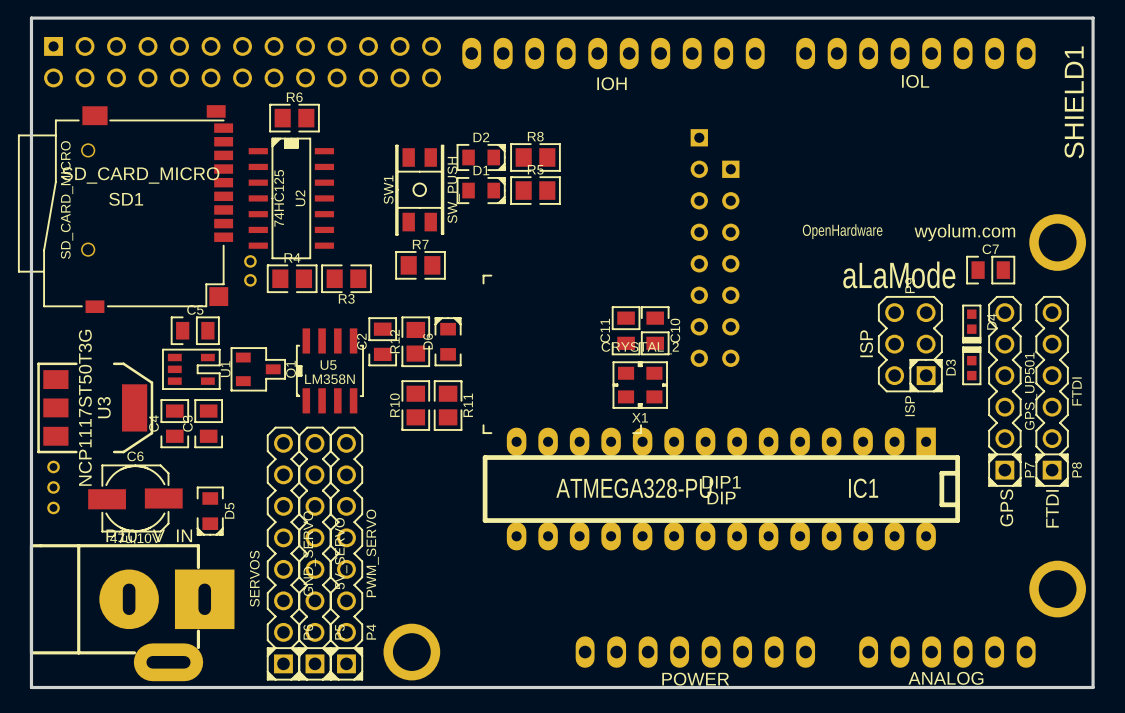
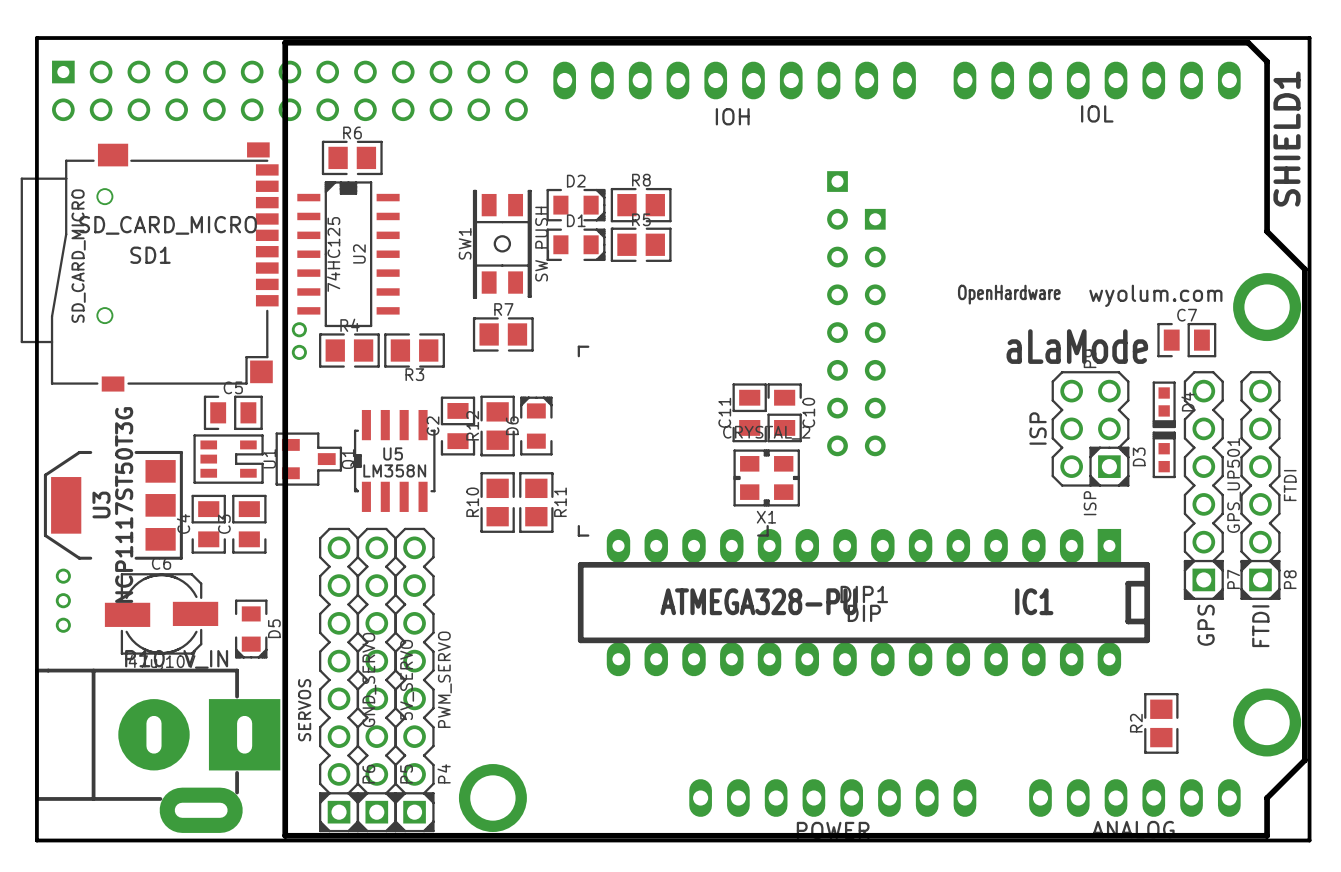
board edge: none -> (285, 42) (285, 835) (1267, 835) (1267, 798) (1304, 760) (1304, 269) (1267, 231) (1267, 61) (1248, 42) (285, 42)
U3 rotation: 0° (95, 407) -> 180° (113, 505)
R2: none -> (1161, 723)

